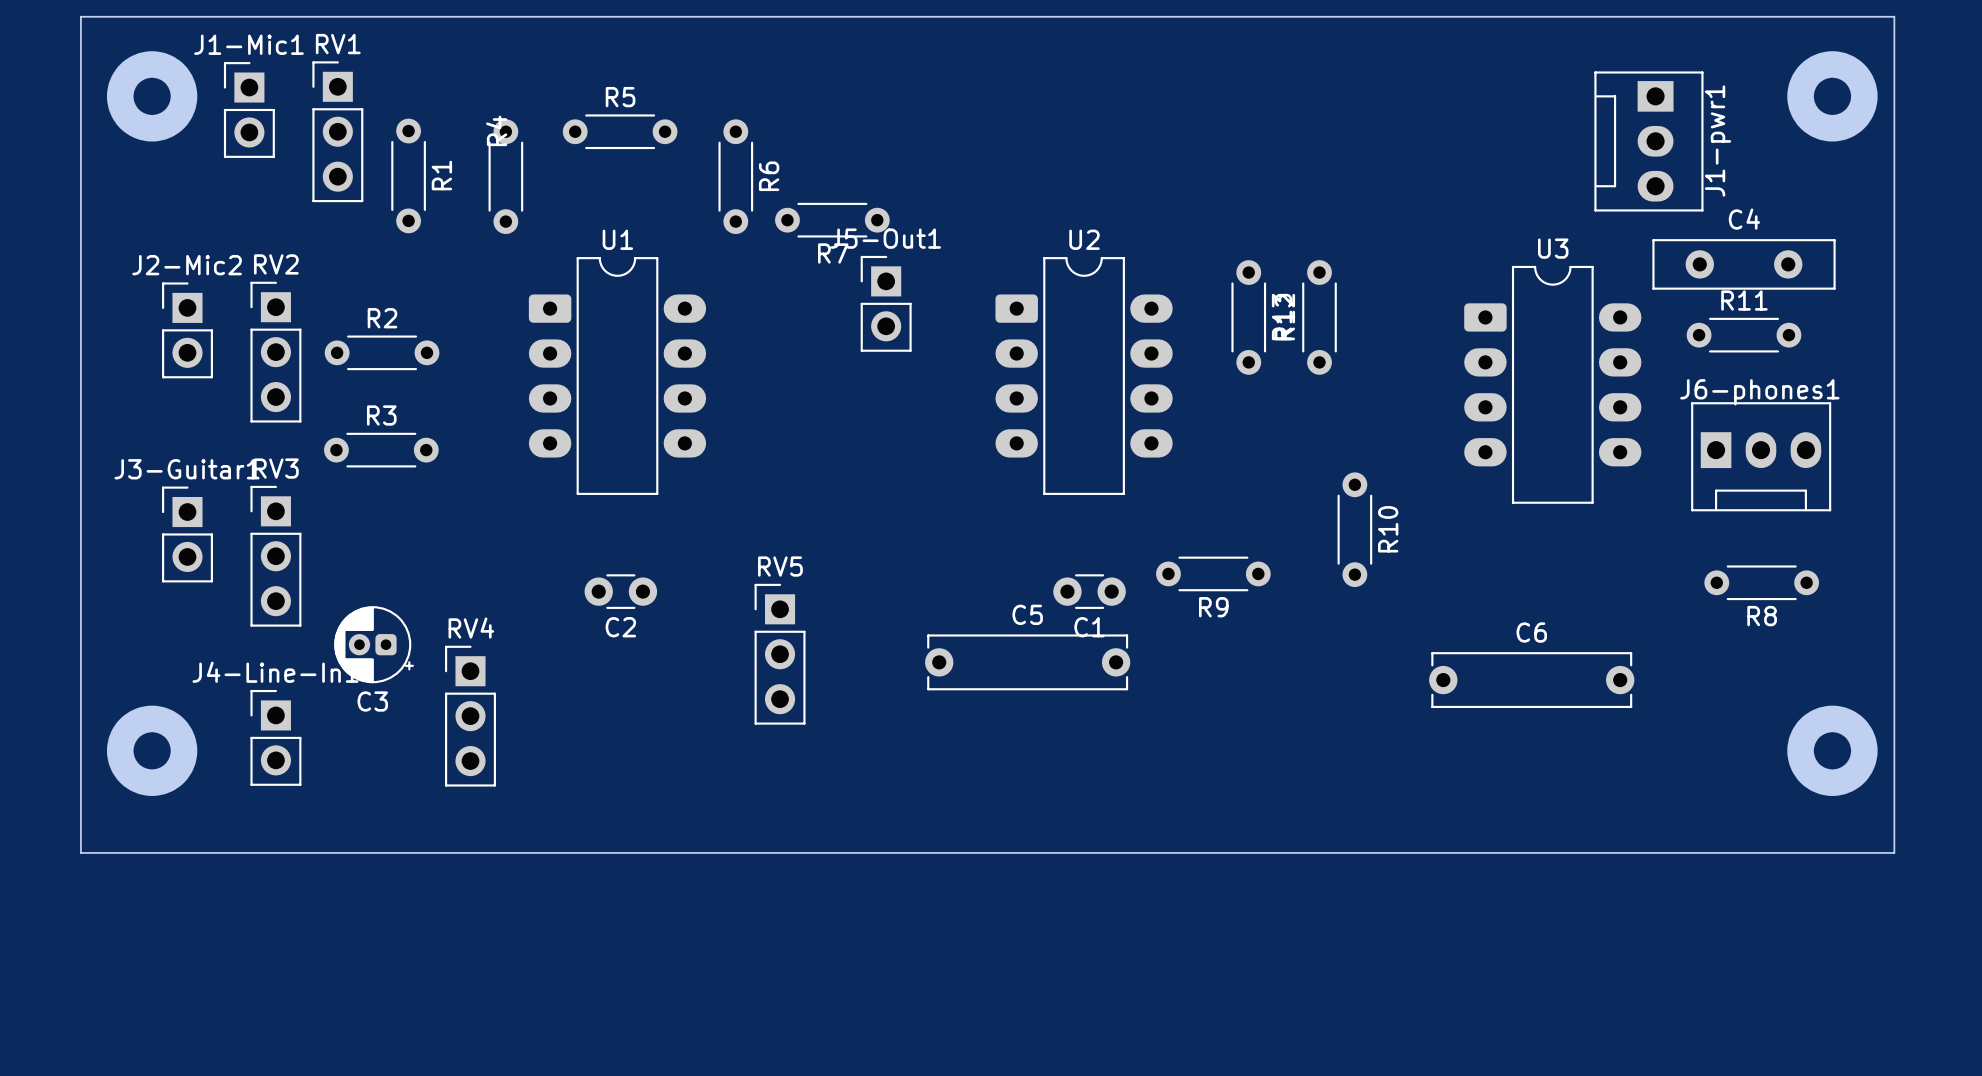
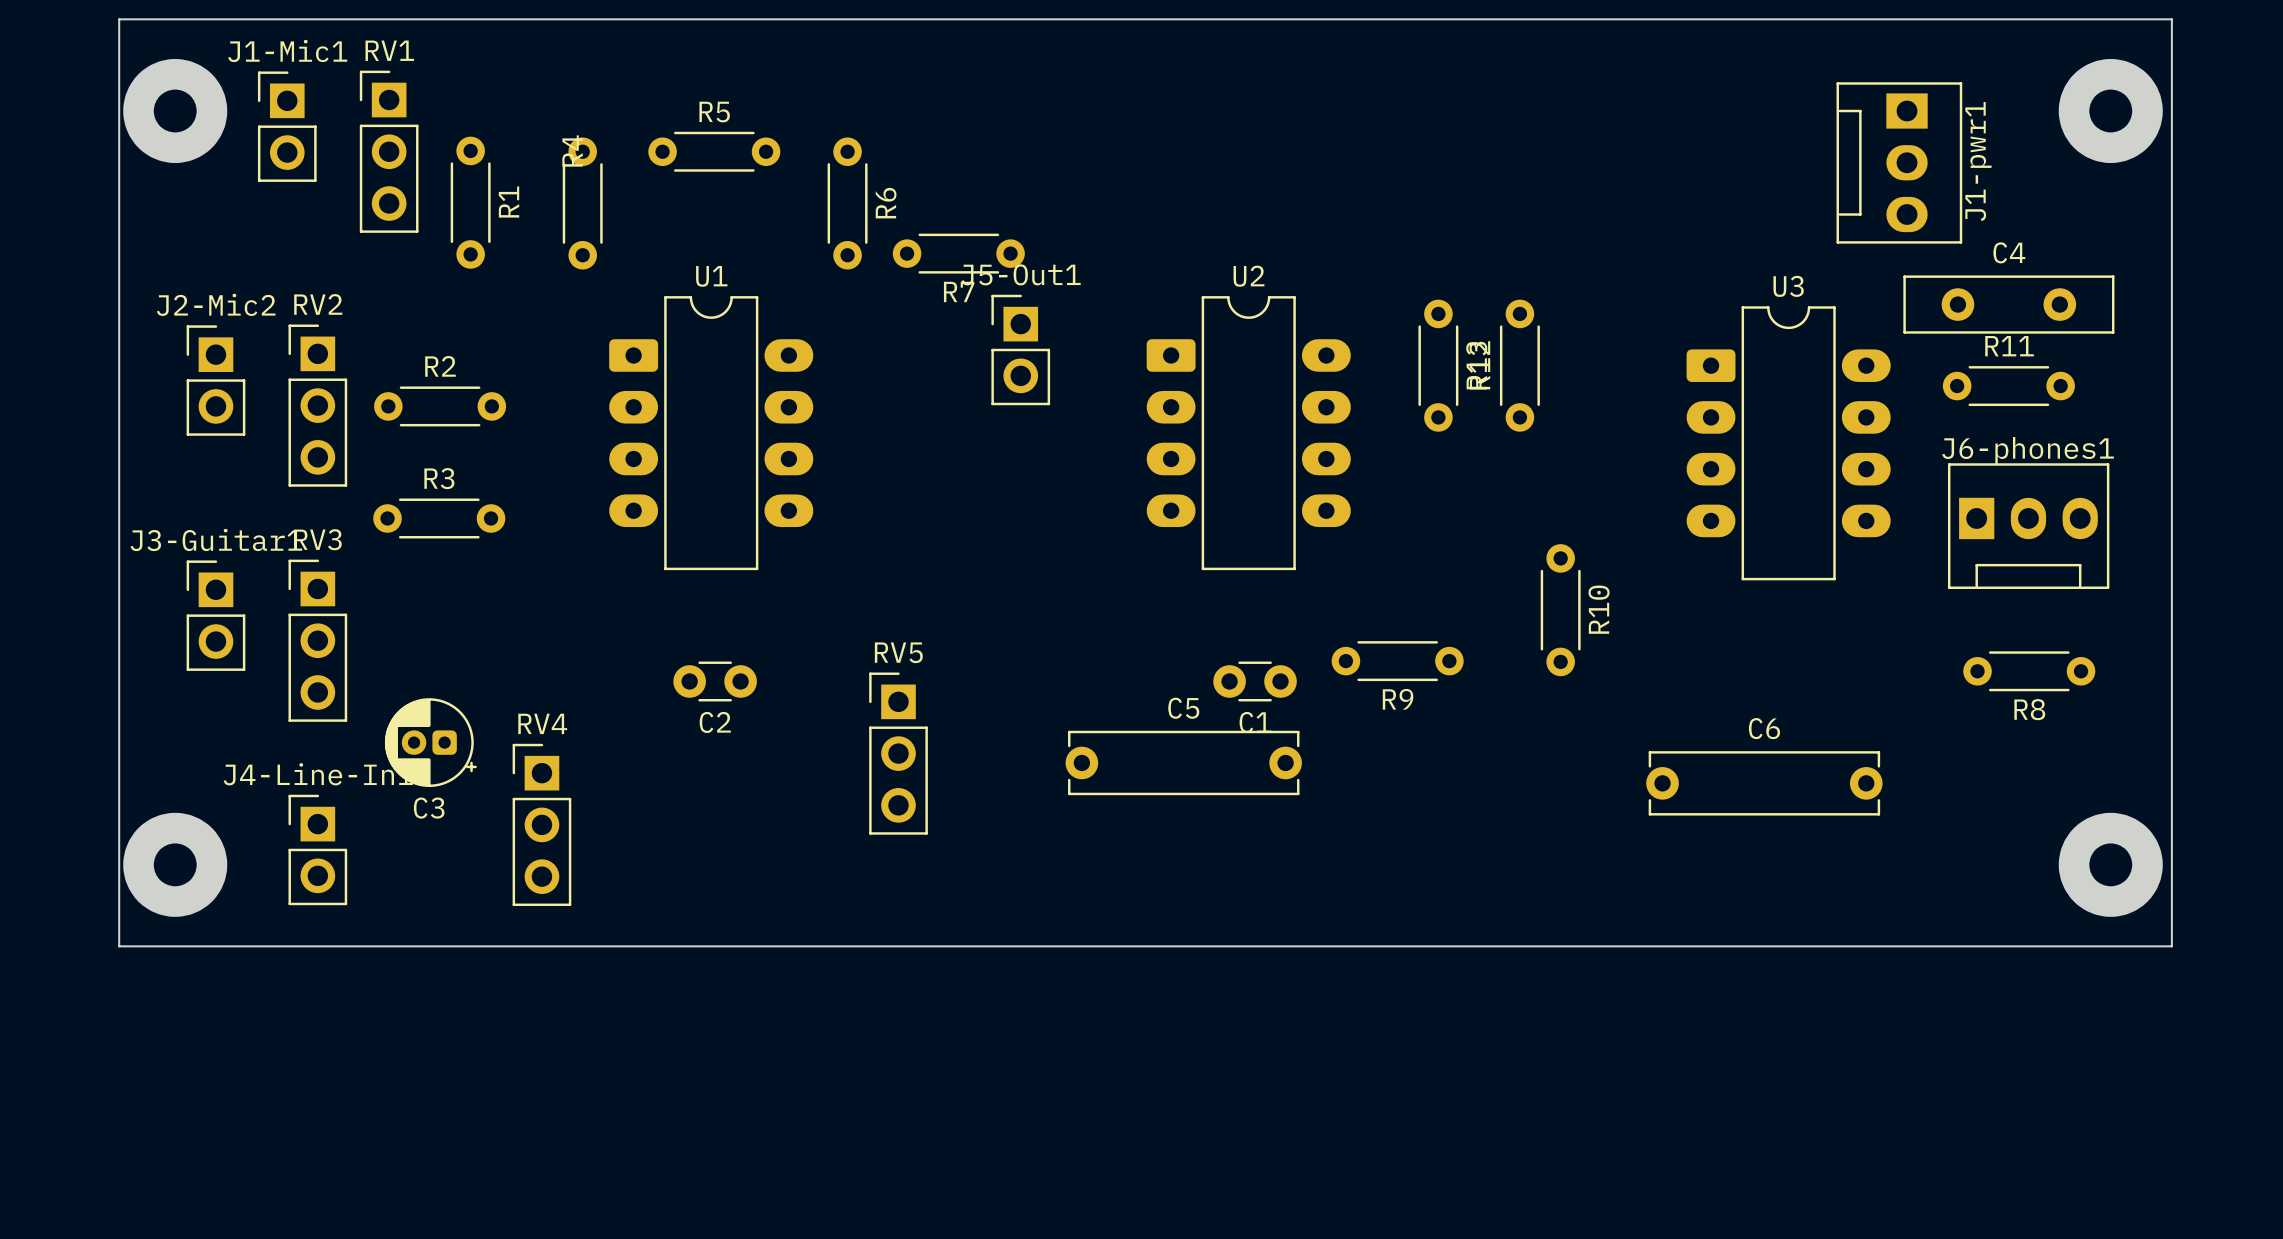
board edge: (103, 16) (80, 16) (80, 852) (1894, 852) (1894, 16) (1885, 16) -> (119, 19) (119, 946) (2171, 946) (2171, 19)

